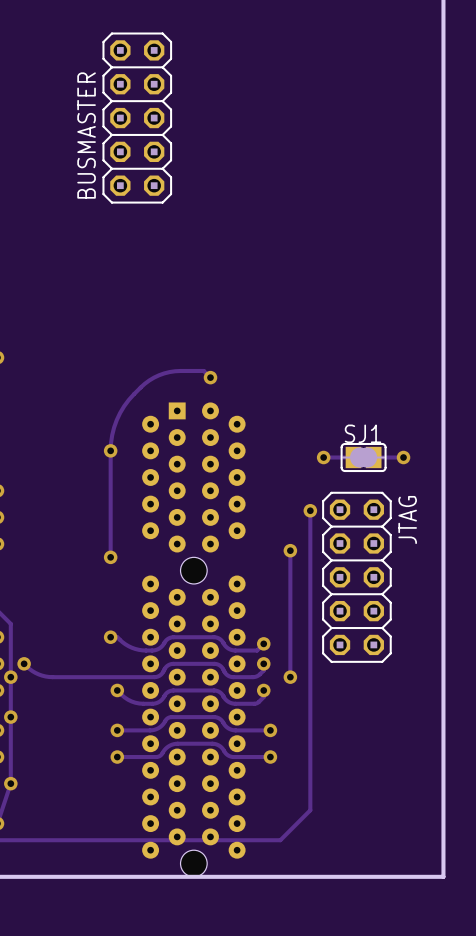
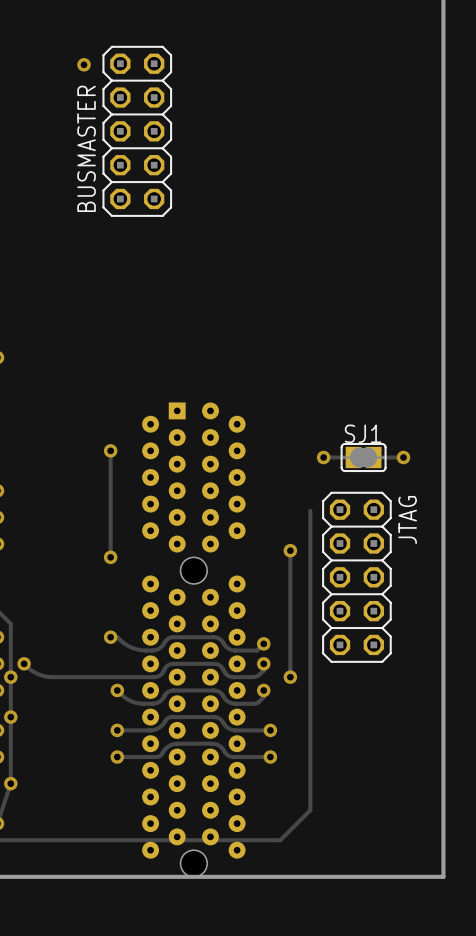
via: none -> (84, 64)
BUSMASTER position: (137, 118) -> (137, 131)
track: (210, 377) (203, 370) (180, 370) (164, 373) (149, 380) (128, 399) (120, 412) (112, 435) (110, 450) -> none
via: (210, 377) -> none
via: (310, 510) -> none

